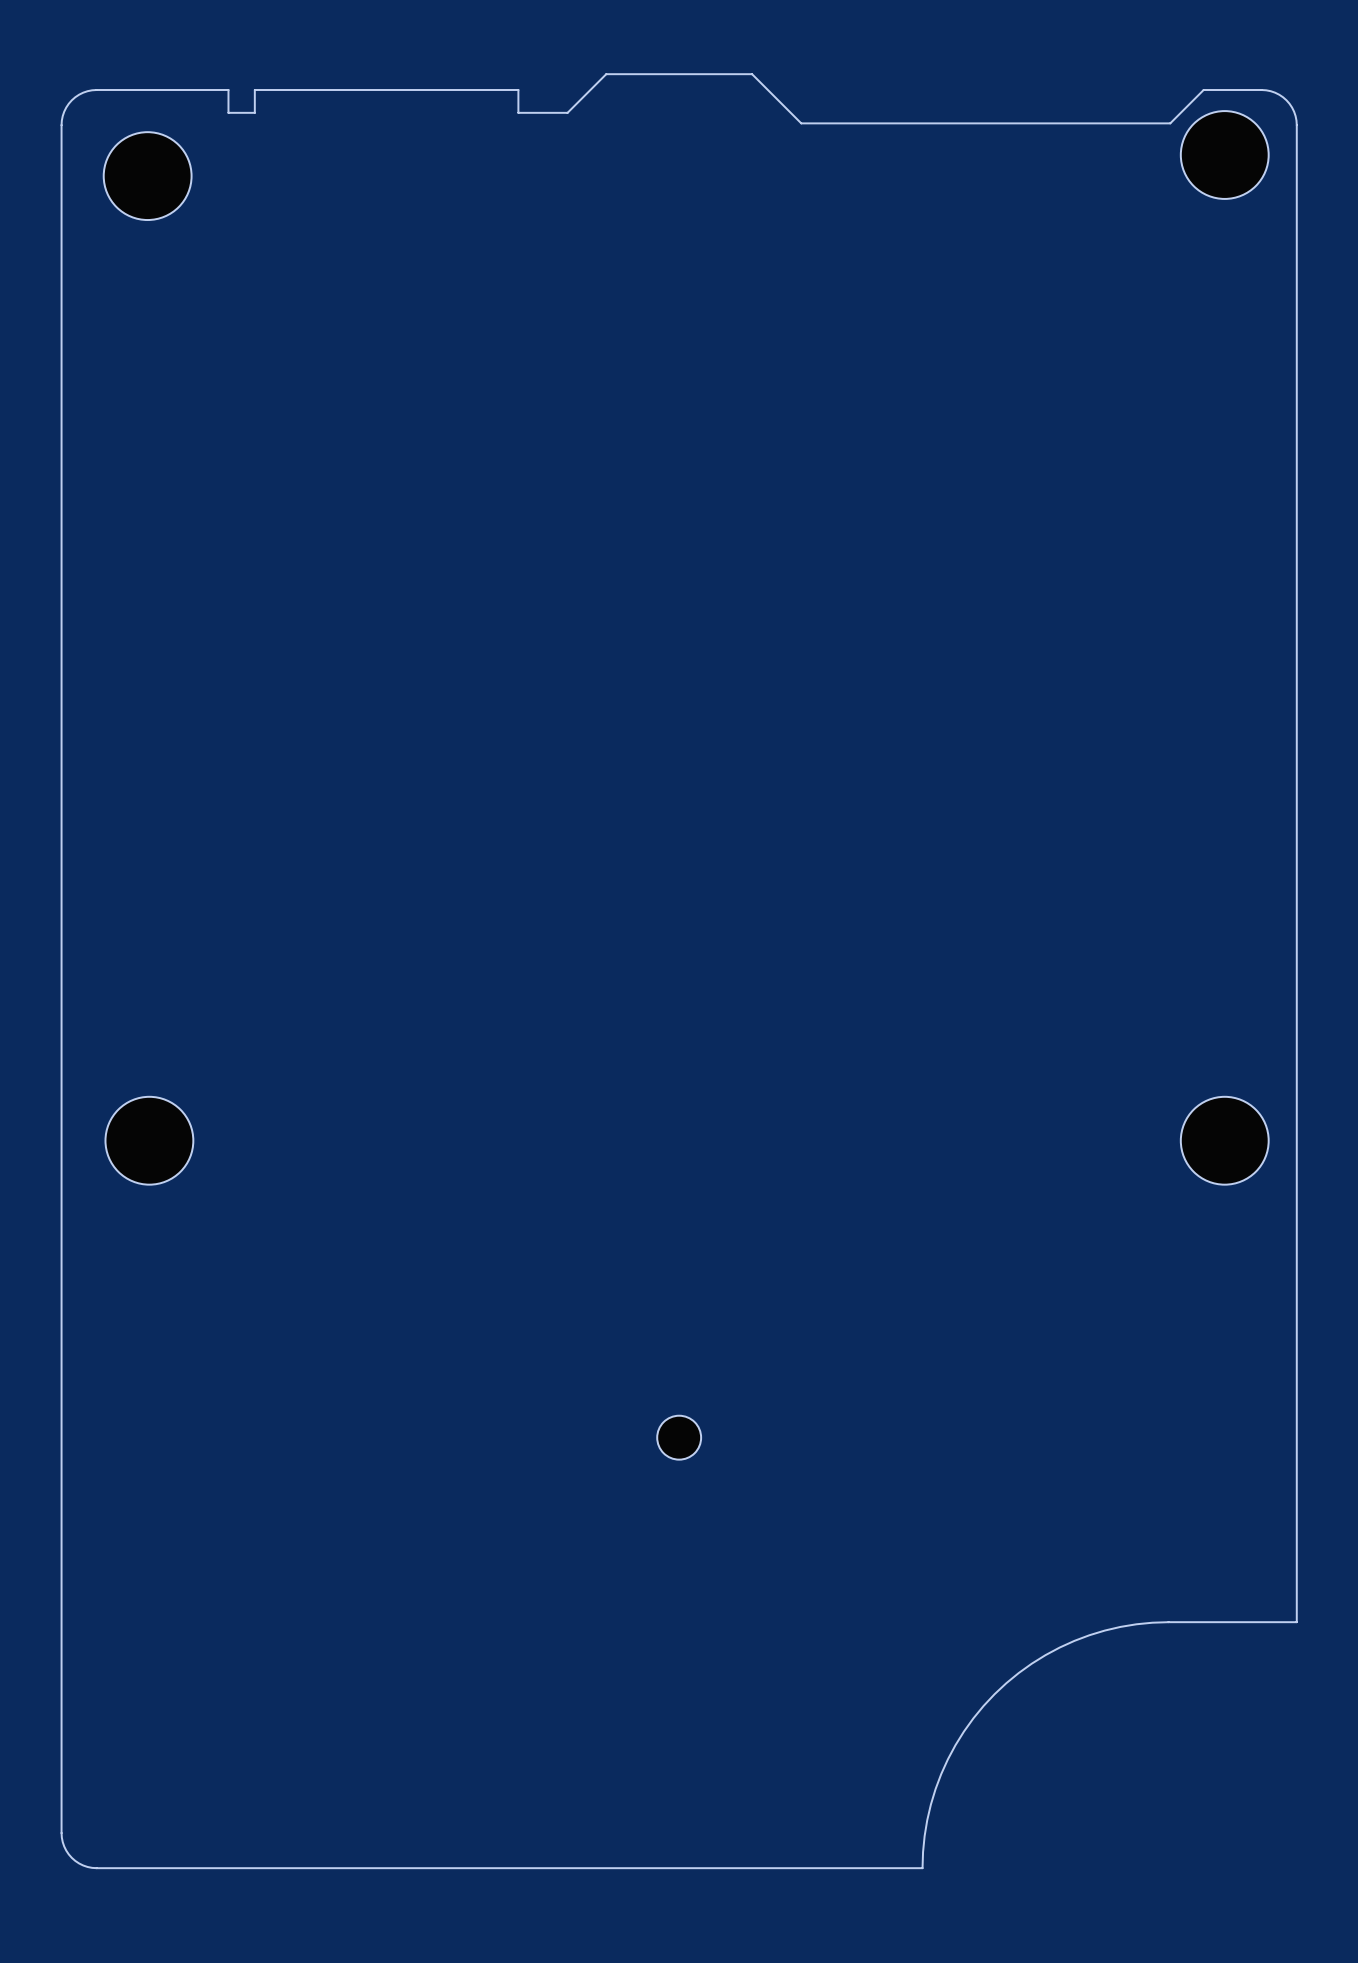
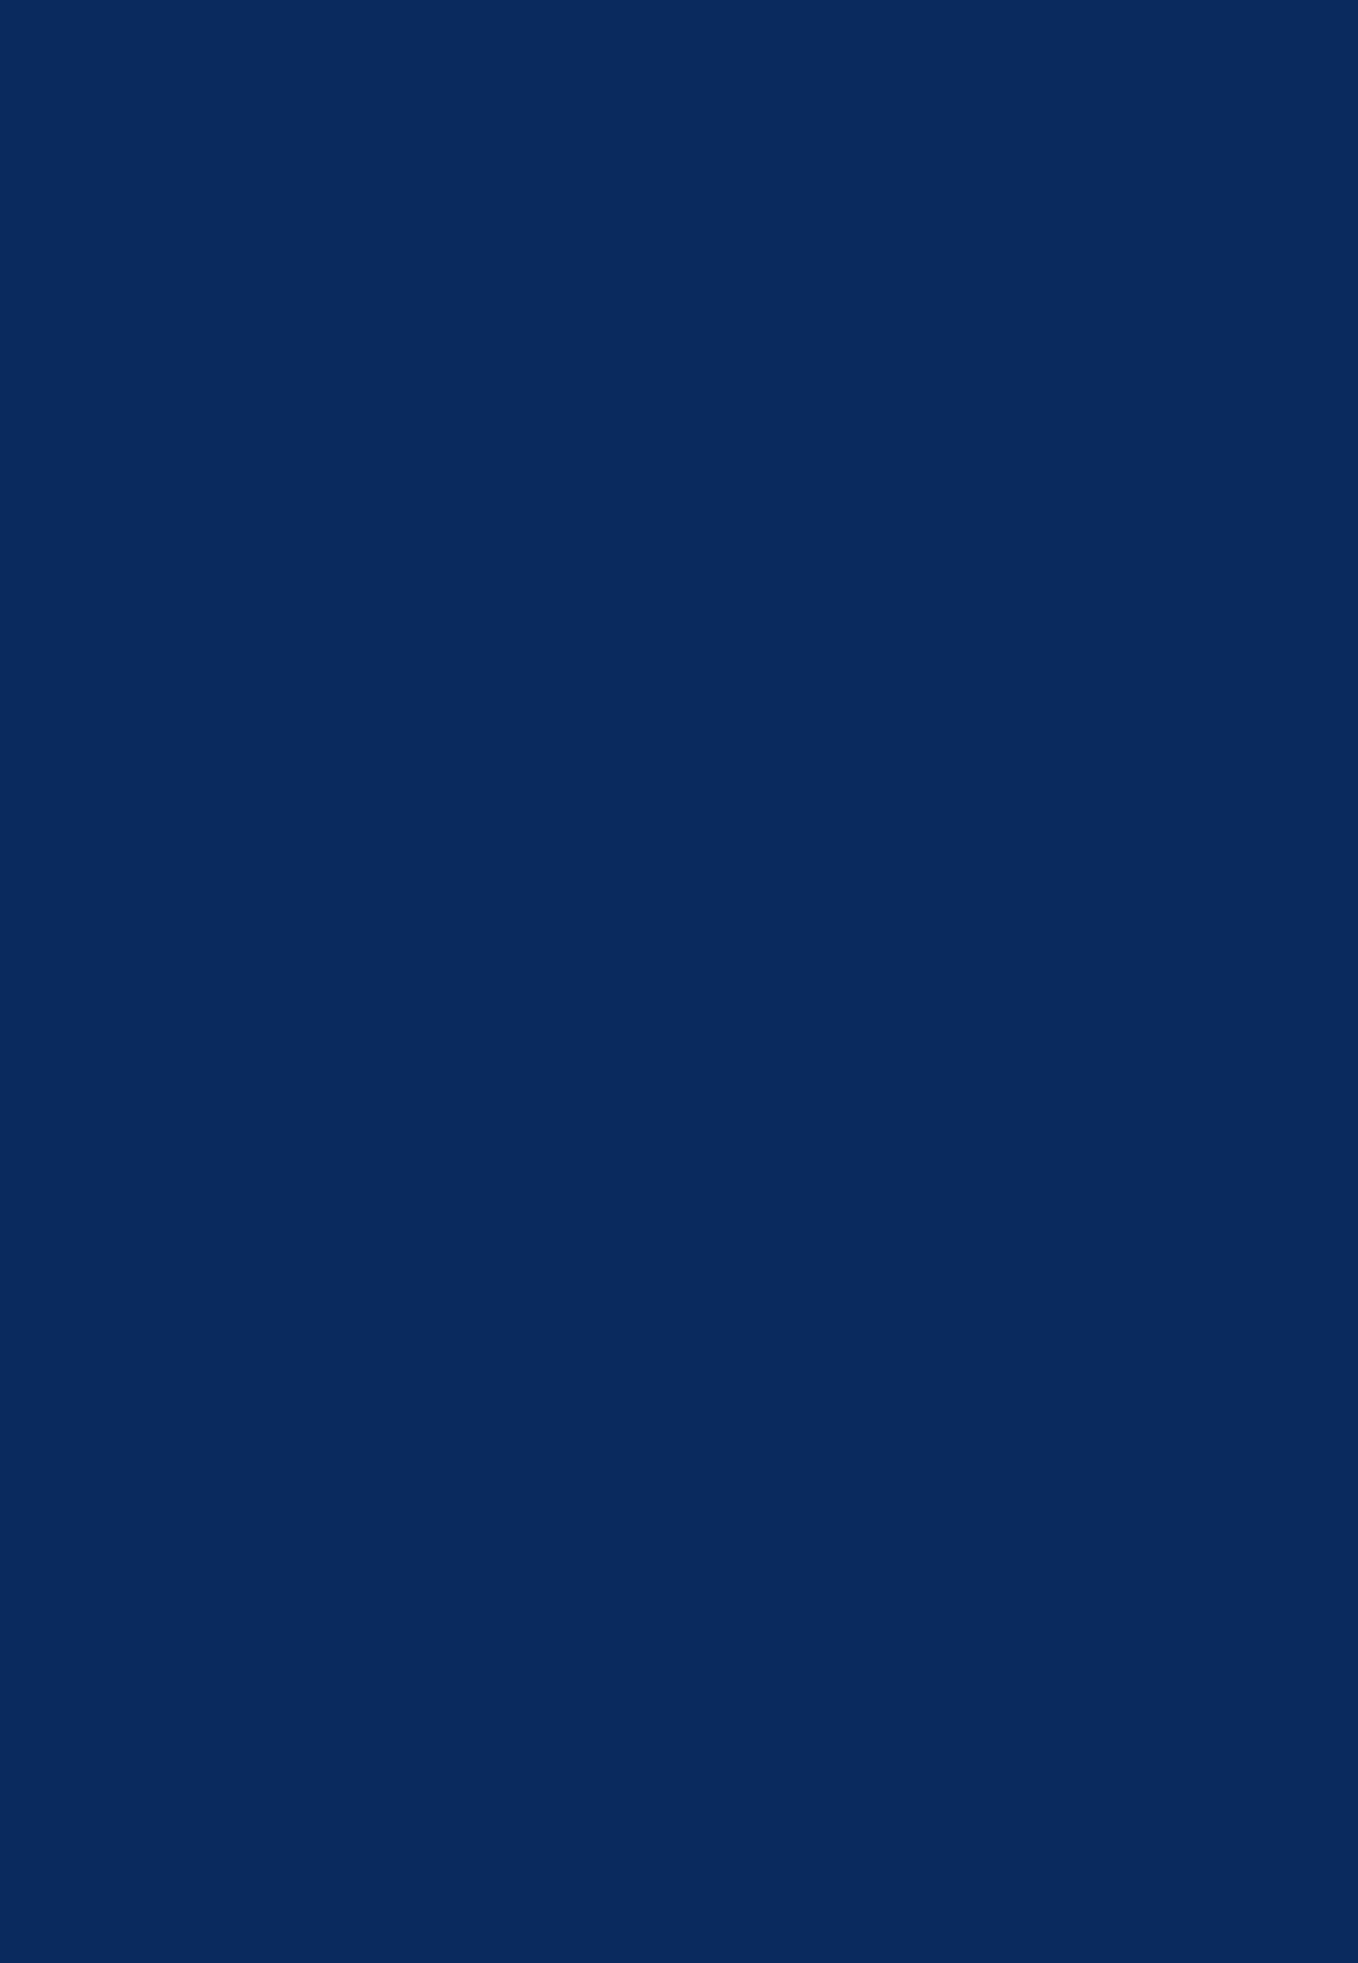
board edge: (606, 74) (567, 112) (518, 112) (518, 89) (254, 89) (254, 112) (228, 112) (228, 89) (96, 89) (83, 92) (75, 97) (66, 107) (62, 116) (61, 1833) (62, 1842) (68, 1854) (75, 1860) (87, 1866) (922, 1868) (927, 1820) (935, 1789) (947, 1759) (963, 1731) (983, 1705) (1006, 1683) (1031, 1663) (1074, 1640) (1104, 1630) (1136, 1624) (1168, 1622) (1296, 1622) (1296, 125) (1294, 111) (1286, 100) (1270, 91) (1203, 89) (1170, 123) (801, 123) (752, 74) (606, 74) -> none
part: (1224, 155) -> none
part: (147, 176) -> none
part: (149, 1140) -> none
part: (1224, 1140) -> none
part: (679, 1437) -> none

